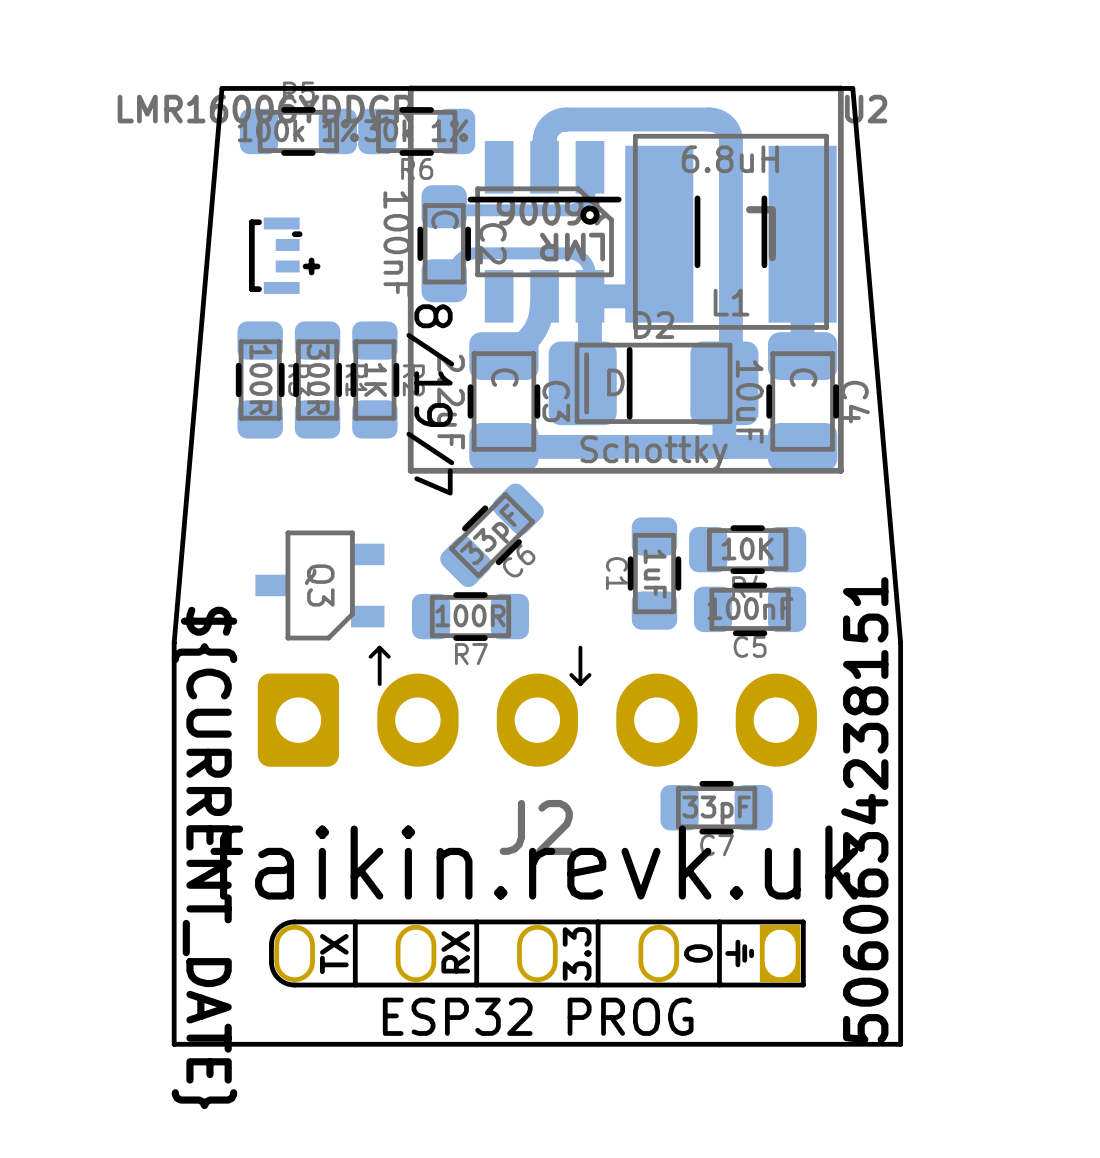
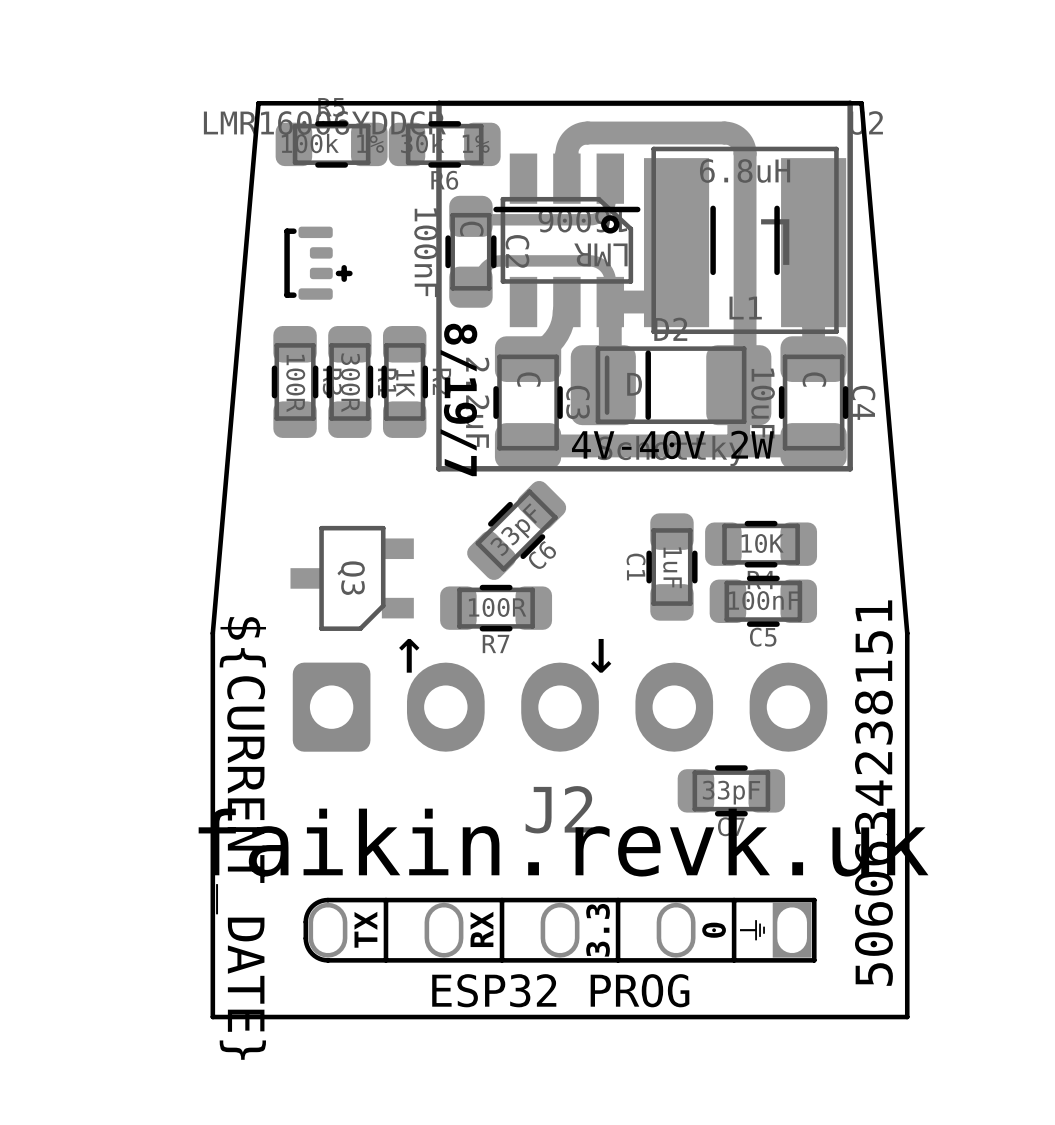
part footprint: [248, 217, 321, 294] -> [284, 226, 353, 300]
U2 text: none -> 4V-40V 2W (672, 444)

